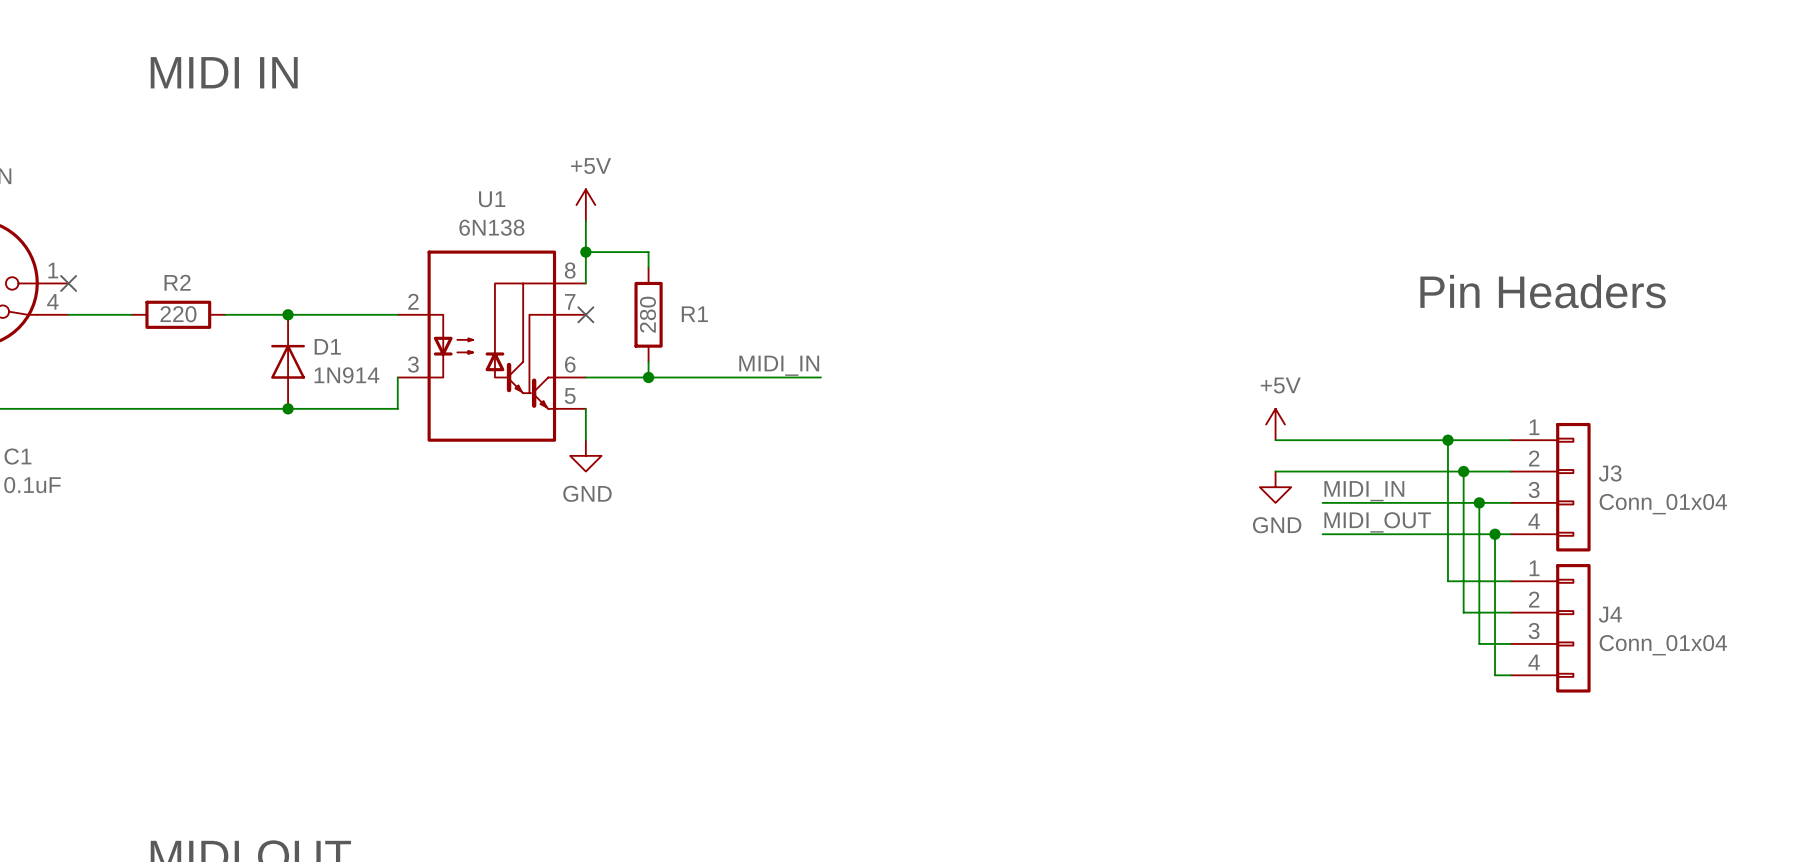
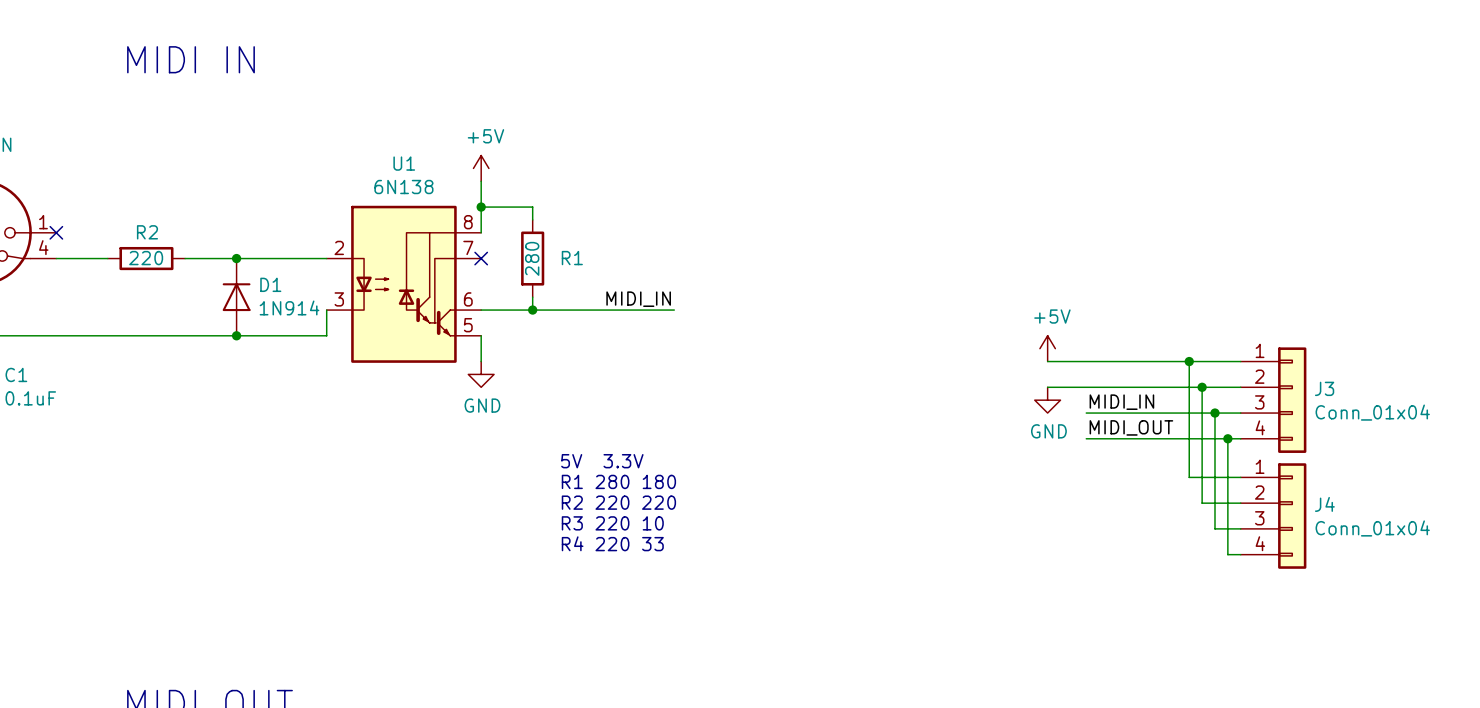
text: Pin Headers (1543, 291) -> none
text: none -> 5V 3.3V (602, 461)
text: none -> R1 280 180 (618, 481)
text: none -> R2 220 220 (618, 502)
text: none -> R3 220 10 (612, 523)
text: none -> R4 220 33 (612, 543)

